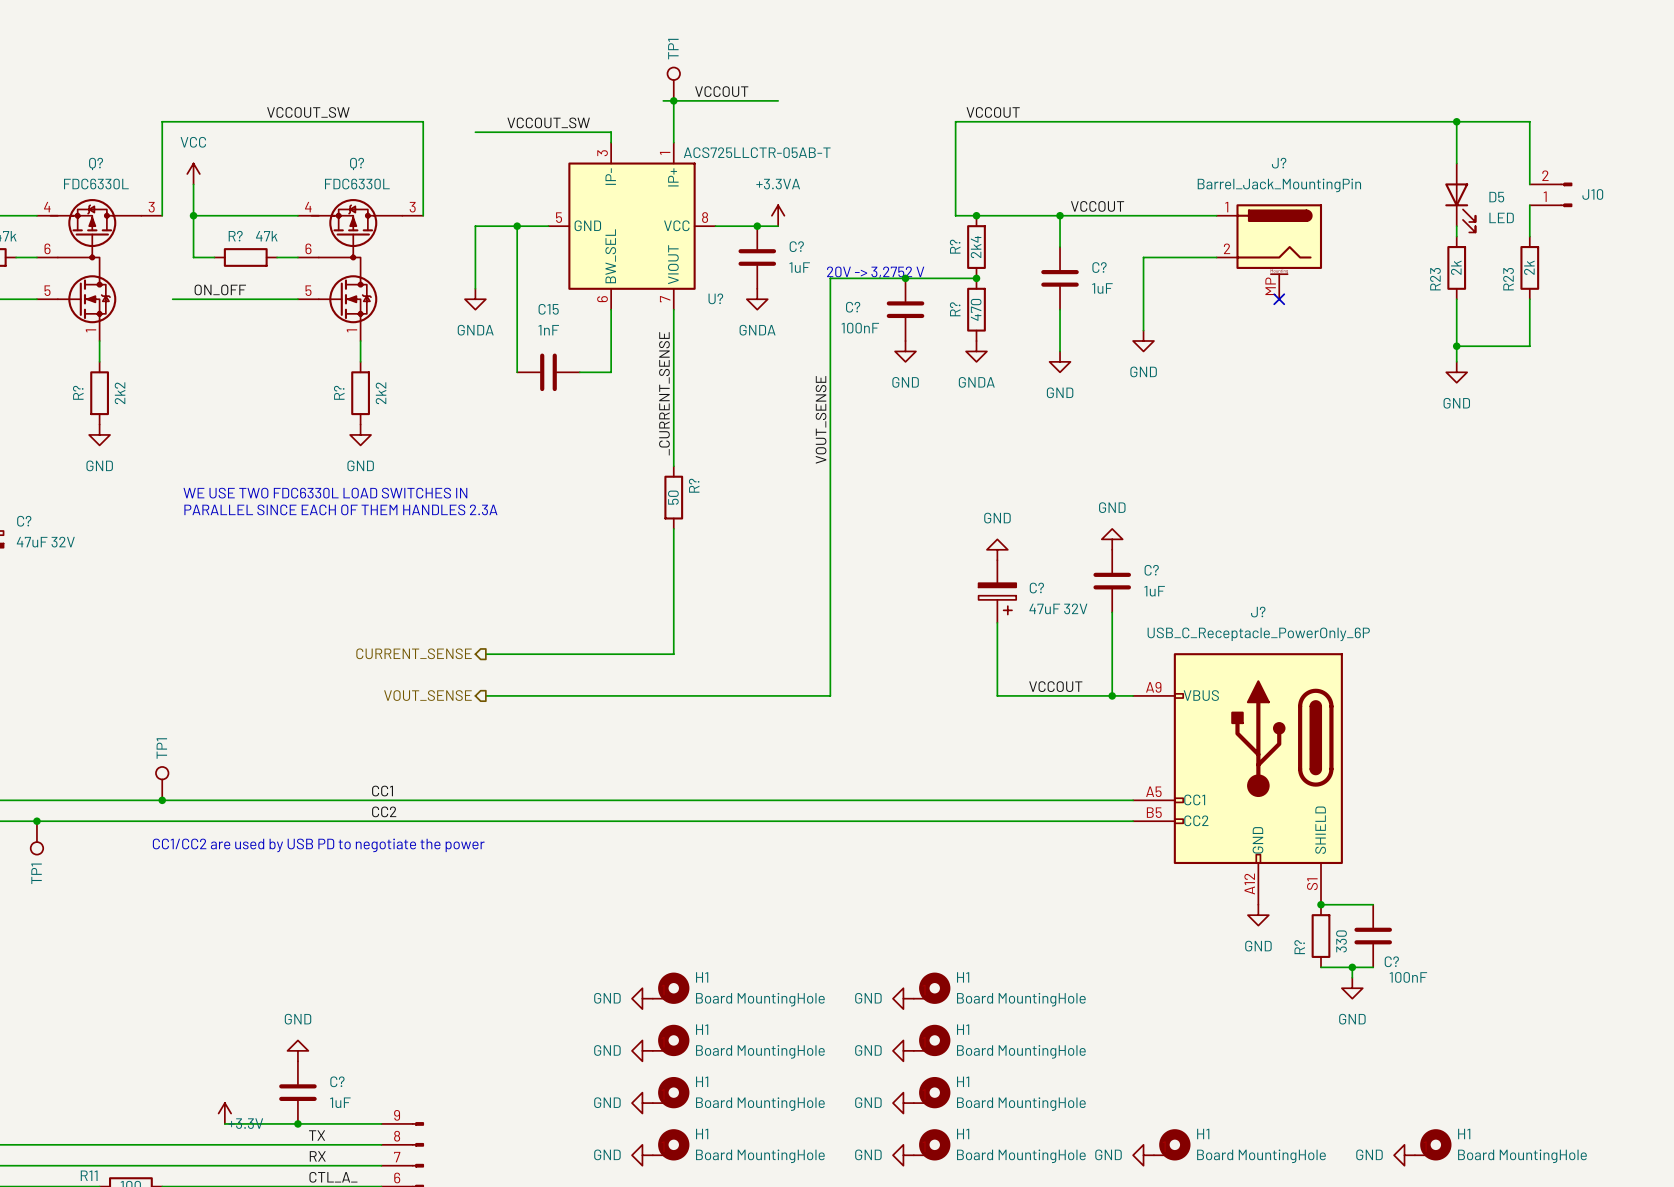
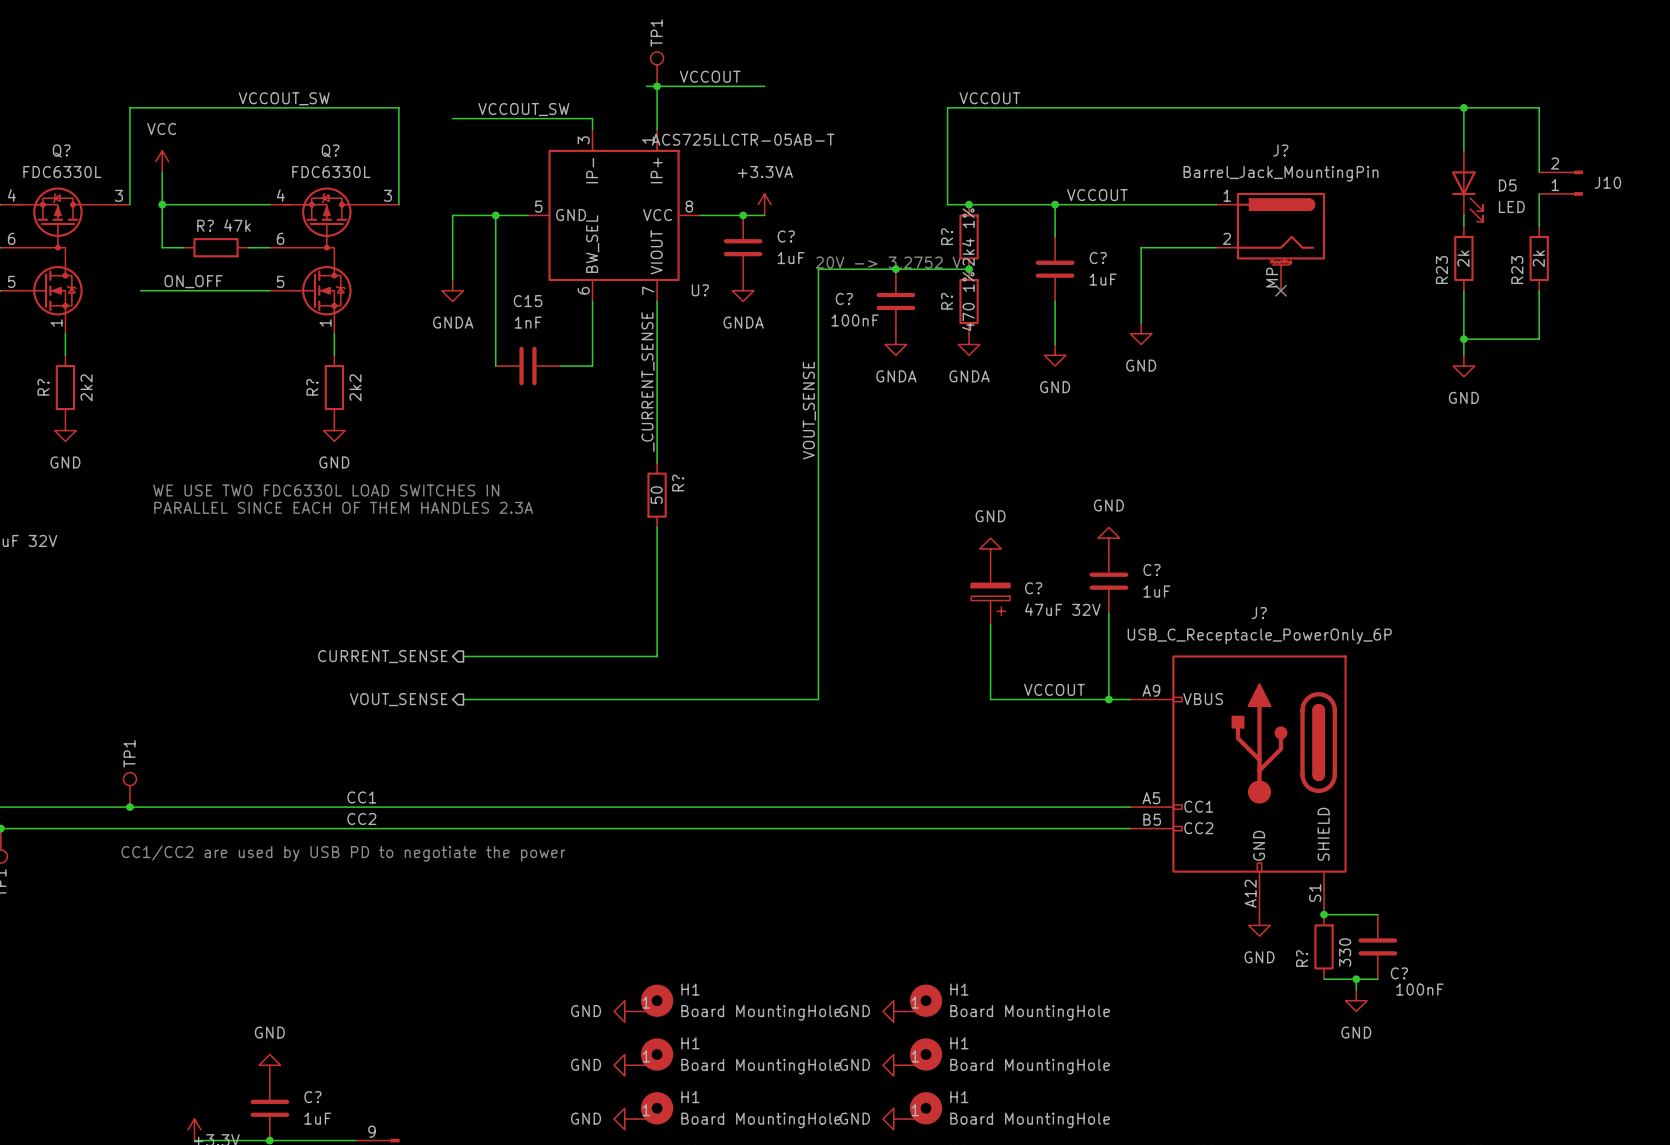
R? value: 2k4 (976, 247) -> 2k4 1% (968, 237)
R? value: 470 (976, 309) -> 470 1% (968, 301)
power symbol: GND (905, 351) -> GNDA (895, 344)

